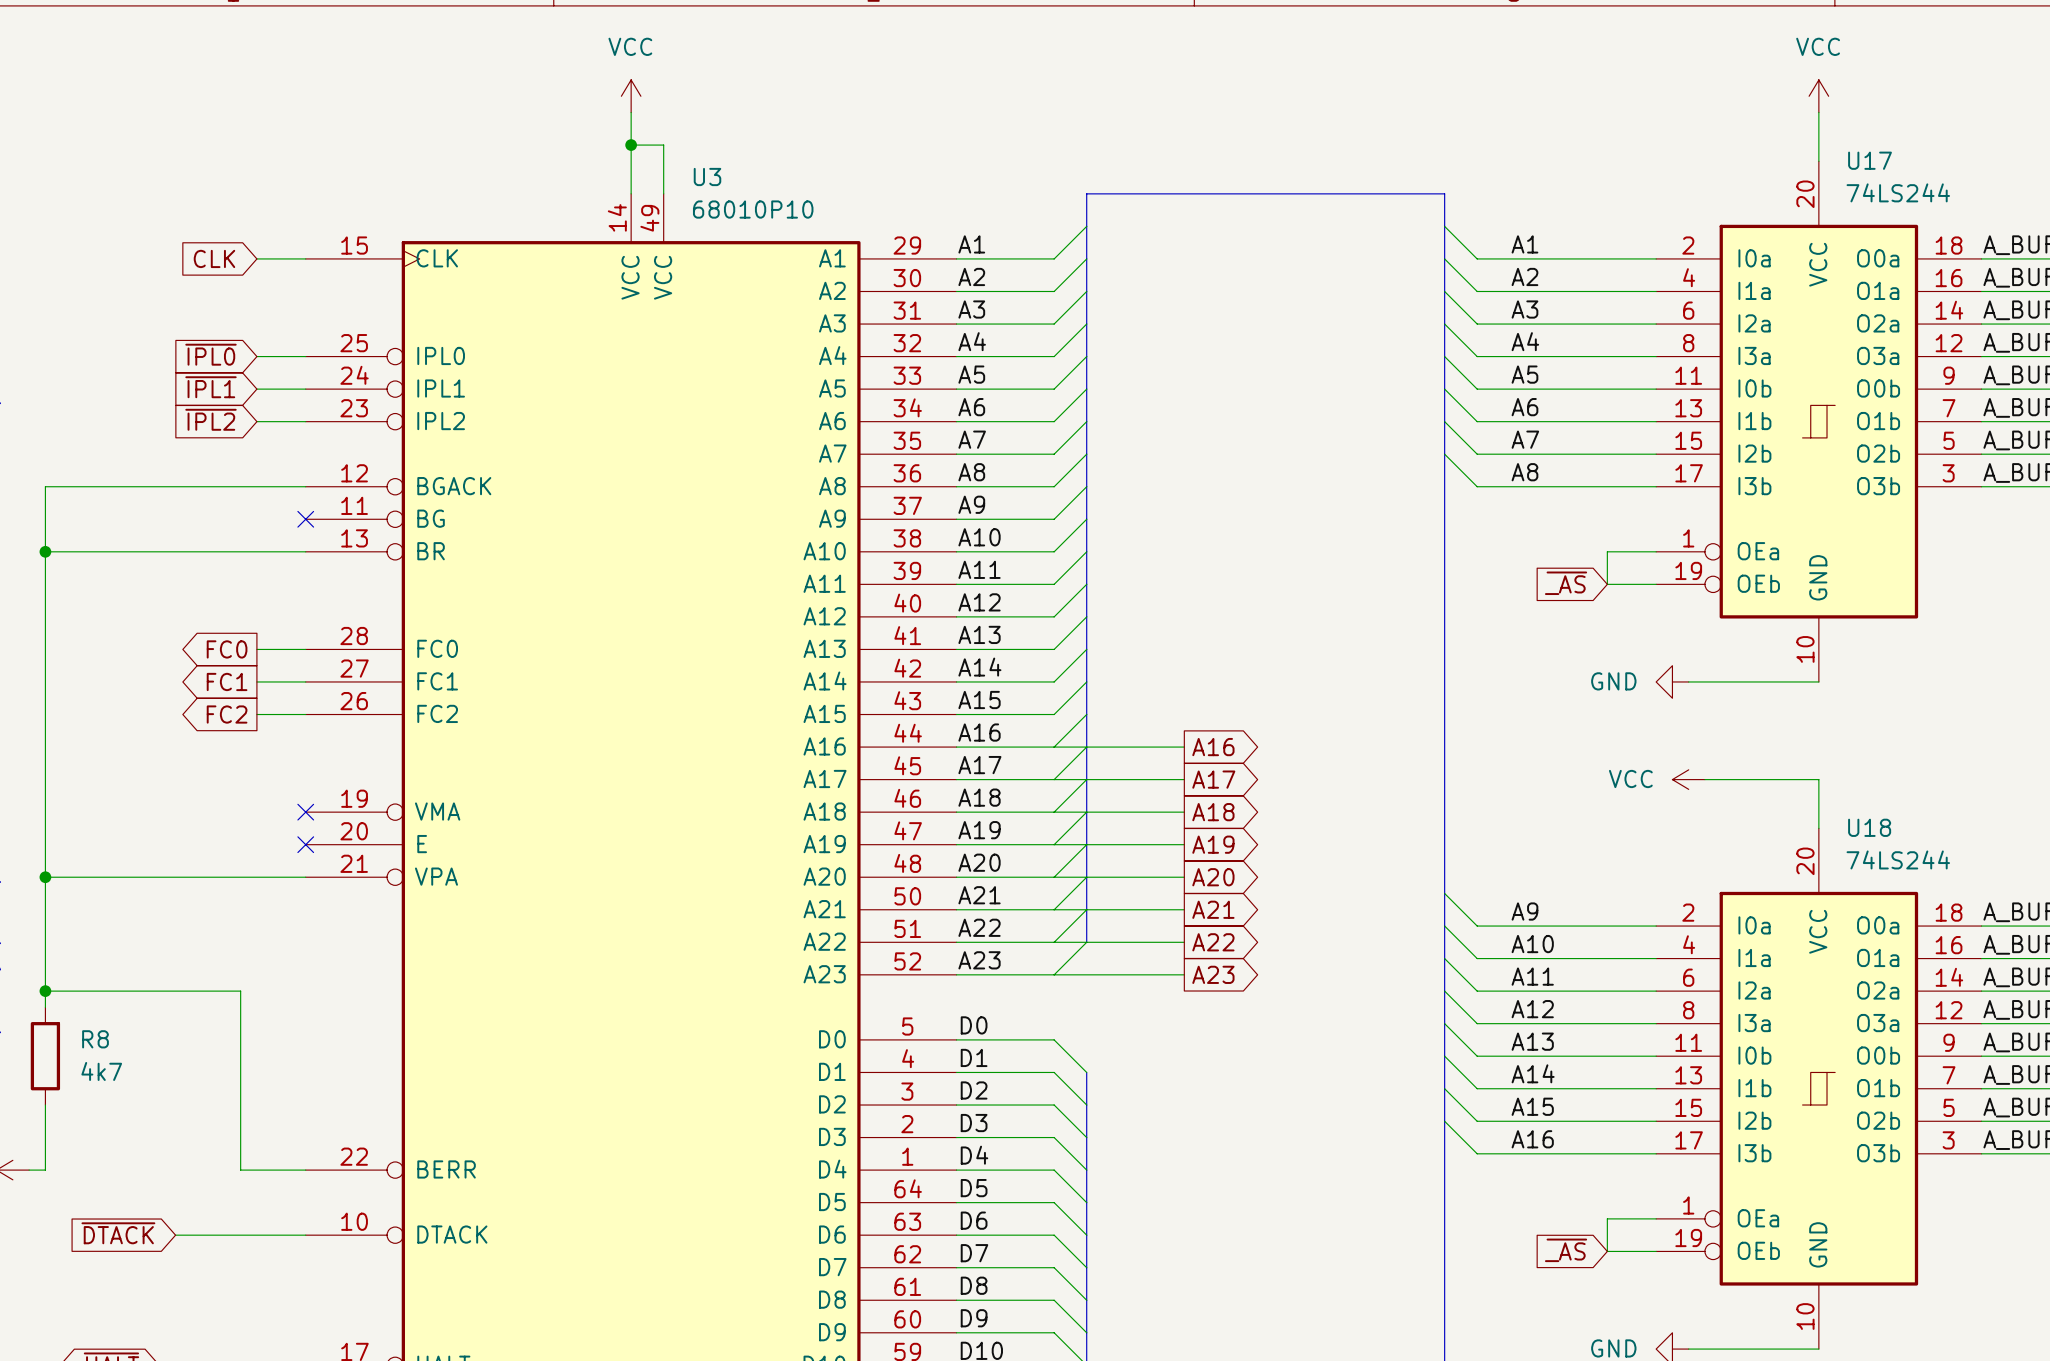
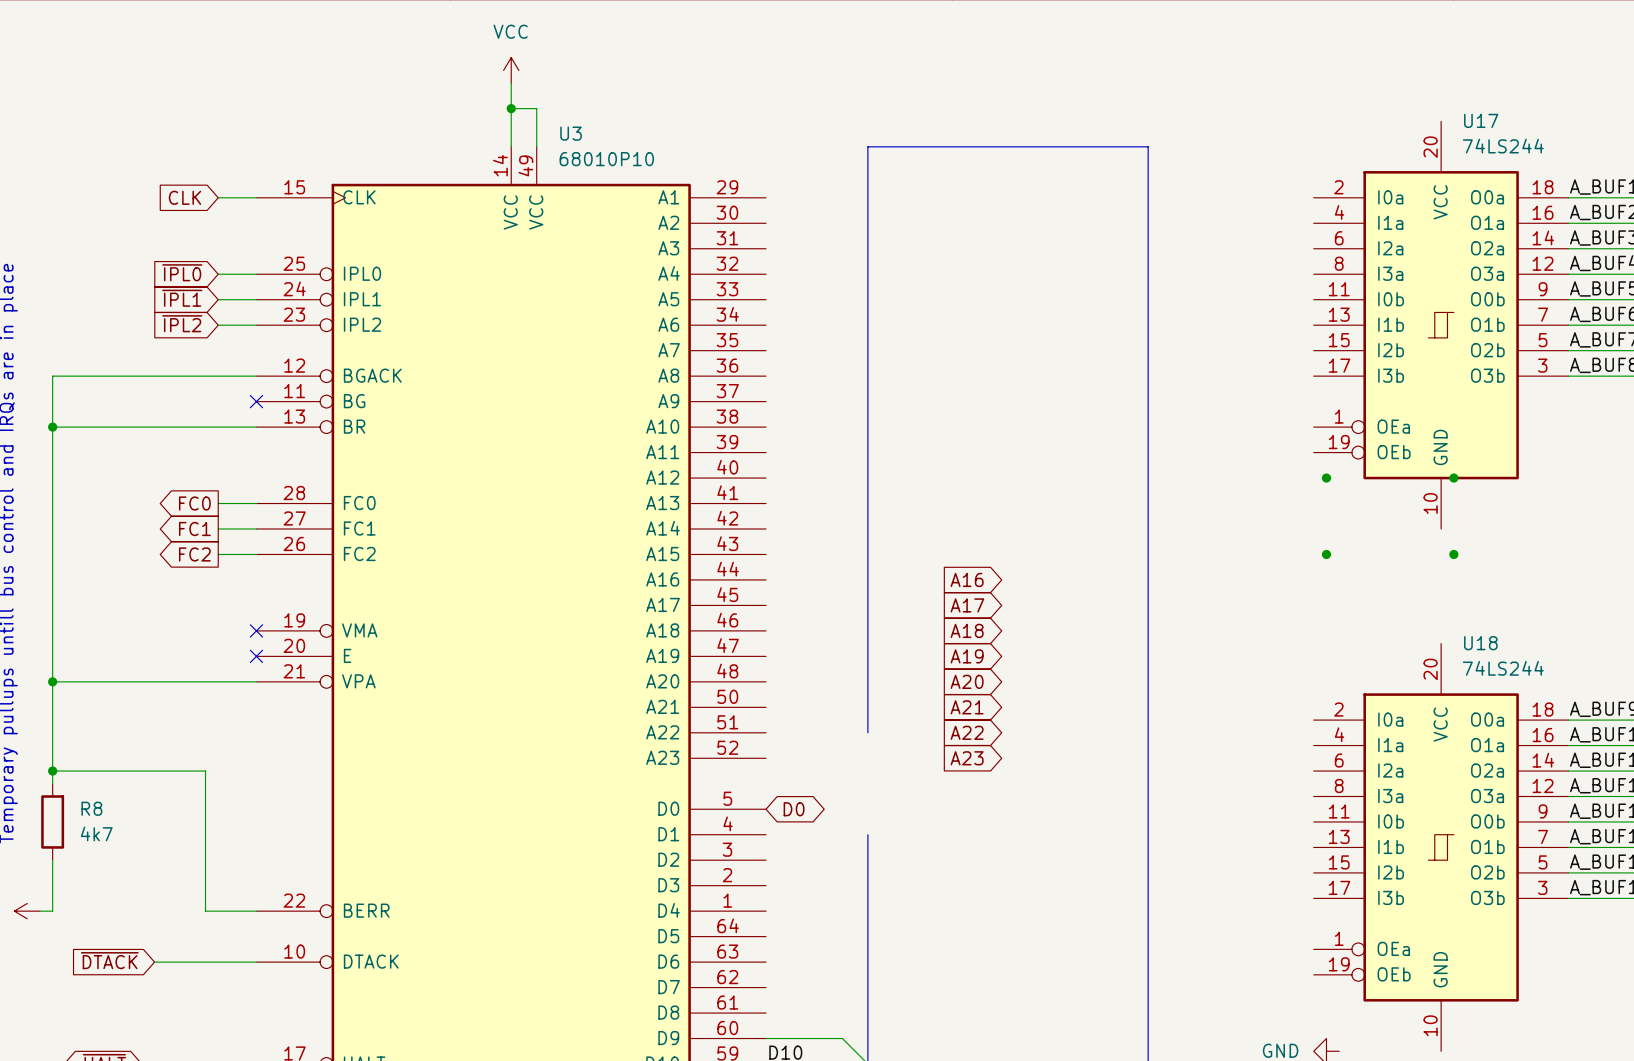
power symbol: VCC (1818, 96) -> none
wire: (1818, 112) (1818, 161) -> none
wire: (1086, 226) (1054, 258) (956, 258) -> none
wire: (1444, 226) (1477, 258) (1656, 258) -> none
label: A1 (971, 244) -> none
label: A1 (1524, 244) -> none
wire: (1086, 258) (1054, 291) (956, 291) -> none
wire: (1444, 258) (1477, 291) (1656, 291) -> none
label: A2 (971, 276) -> none
label: A2 (1524, 276) -> none
wire: (1086, 291) (1054, 324) (956, 324) -> none
wire: (1444, 291) (1477, 324) (1656, 324) -> none
label: A3 (971, 309) -> none
label: A3 (1524, 309) -> none
wire: (1086, 324) (1054, 356) (956, 356) -> none
wire: (1444, 324) (1477, 356) (1656, 356) -> none
label: A4 (972, 341) -> none
label: A4 (1525, 341) -> none
wire: (1086, 356) (1054, 389) (956, 389) -> none
wire: (1444, 356) (1477, 389) (1656, 389) -> none
label: A5 (971, 374) -> none
label: A5 (1524, 374) -> none
wire: (1086, 389) (1054, 421) (956, 421) -> none
wire: (1444, 389) (1477, 421) (1656, 421) -> none
label: A6 (971, 407) -> none
label: A6 (1524, 407) -> none
wire: (1086, 421) (1054, 454) (956, 454) -> none
wire: (1444, 421) (1477, 454) (1656, 454) -> none
label: A7 (972, 439) -> none
label: A7 (1525, 439) -> none
wire: (1086, 454) (1054, 486) (956, 486) -> none
wire: (1444, 454) (1477, 486) (1656, 486) -> none
label: A8 (971, 472) -> none
label: A8 (1524, 472) -> none
wire: (1086, 486) (1054, 519) (956, 519) -> none
label: A9 (971, 504) -> none
wire: (1086, 519) (1054, 551) (956, 551) -> none
label: A10 (979, 537) -> none
wire: (1086, 551) (1054, 584) (956, 584) -> none
wire: (1656, 551) (1607, 551) (1607, 584) (1656, 584) -> none
label: A11 (979, 569) -> none
global label: ~{_AS} (1566, 583) -> none
wire: (1086, 584) (1054, 616) (956, 616) -> none
label: A12 (979, 602) -> none
wire: (1086, 616) (1054, 649) (956, 649) -> none
junction: none -> (1326, 478)
junction: none -> (1453, 478)
label: A13 (979, 634) -> none
wire: (1086, 649) (1054, 681) (956, 681) -> none
label: A14 (979, 667) -> none
wire: (1086, 681) (1054, 714) (956, 714) -> none
power symbol: GND (1672, 681) -> none
wire: (1688, 681) (1818, 681) -> none
label: A15 (979, 700) -> none
wire: (1086, 714) (1054, 747) -> none
junction: none -> (1326, 554)
junction: none -> (1453, 554)
label: A16 (979, 732) -> none
wire: (956, 747) (1184, 747) -> none
wire: (1086, 747) (1054, 779) -> none
label: A17 (979, 765) -> none
wire: (956, 779) (1184, 779) -> none
wire: (1086, 779) (1054, 812) -> none
power symbol: VCC (1688, 779) -> none
wire: (1704, 779) (1818, 779) (1818, 828) -> none
label: A18 (979, 797) -> none
wire: (956, 812) (1184, 812) -> none
wire: (1086, 812) (1054, 844) -> none
label: A19 (979, 830) -> none
wire: (956, 844) (1184, 844) -> none
wire: (1086, 844) (1054, 877) -> none
label: A20 (979, 862) -> none
wire: (956, 877) (1184, 877) -> none
wire: (1086, 877) (1054, 909) -> none
wire: (1444, 893) (1477, 926) (1656, 926) -> none
label: A21 (979, 895) -> none
wire: (956, 909) (1184, 909) -> none
wire: (1086, 909) (1054, 942) -> none
label: A9 (1524, 911) -> none
wire: (1444, 926) (1477, 958) (1656, 958) -> none
label: A22 (979, 927) -> none
wire: (956, 942) (1184, 942) -> none
wire: (1086, 942) (1054, 974) -> none
label: A10 (1532, 944) -> none
wire: (1444, 958) (1477, 991) (1656, 991) -> none
label: A23 (979, 960) -> none
wire: (956, 974) (1184, 974) -> none
label: A11 (1532, 976) -> none
wire: (1444, 991) (1477, 1023) (1656, 1023) -> none
label: A12 (1532, 1009) -> none
wire: (1444, 1023) (1477, 1056) (1656, 1056) -> none
label: D0 (974, 1025) -> none
wire: (956, 1039) (1054, 1039) (1086, 1072) -> none
global label: none -> D0 (794, 809)
label: A13 (1532, 1041) -> none
wire: (1444, 1056) (1477, 1088) (1656, 1088) -> none
label: D1 (974, 1057) -> none
wire: (956, 1072) (1054, 1072) (1086, 1105) -> none
label: A14 (1533, 1073) -> none
wire: (1444, 1088) (1477, 1121) (1656, 1121) -> none
label: D2 (974, 1090) -> none
wire: (956, 1105) (1054, 1105) (1086, 1137) -> none
label: A15 (1532, 1106) -> none
wire: (1444, 1121) (1477, 1153) (1656, 1153) -> none
label: D3 (974, 1123) -> none
wire: (956, 1137) (1054, 1137) (1086, 1170) -> none
label: A16 (1532, 1139) -> none
label: D4 (974, 1155) -> none
wire: (956, 1170) (1054, 1170) (1086, 1202) -> none
label: D5 (974, 1188) -> none
wire: (956, 1202) (1054, 1202) (1086, 1235) -> none
wire: (1656, 1218) (1607, 1218) (1607, 1251) (1656, 1251) -> none
label: D6 (974, 1220) -> none
wire: (956, 1235) (1054, 1235) (1086, 1267) -> none
global label: ~{_AS} (1566, 1250) -> none
label: D7 (974, 1253) -> none
wire: (956, 1267) (1054, 1267) (1086, 1300) -> none
label: D8 (974, 1285) -> none
wire: (956, 1300) (1054, 1300) (1086, 1332) -> none
label: D9 (974, 1318) -> none
wire: (1688, 1349) (1818, 1349) -> none

